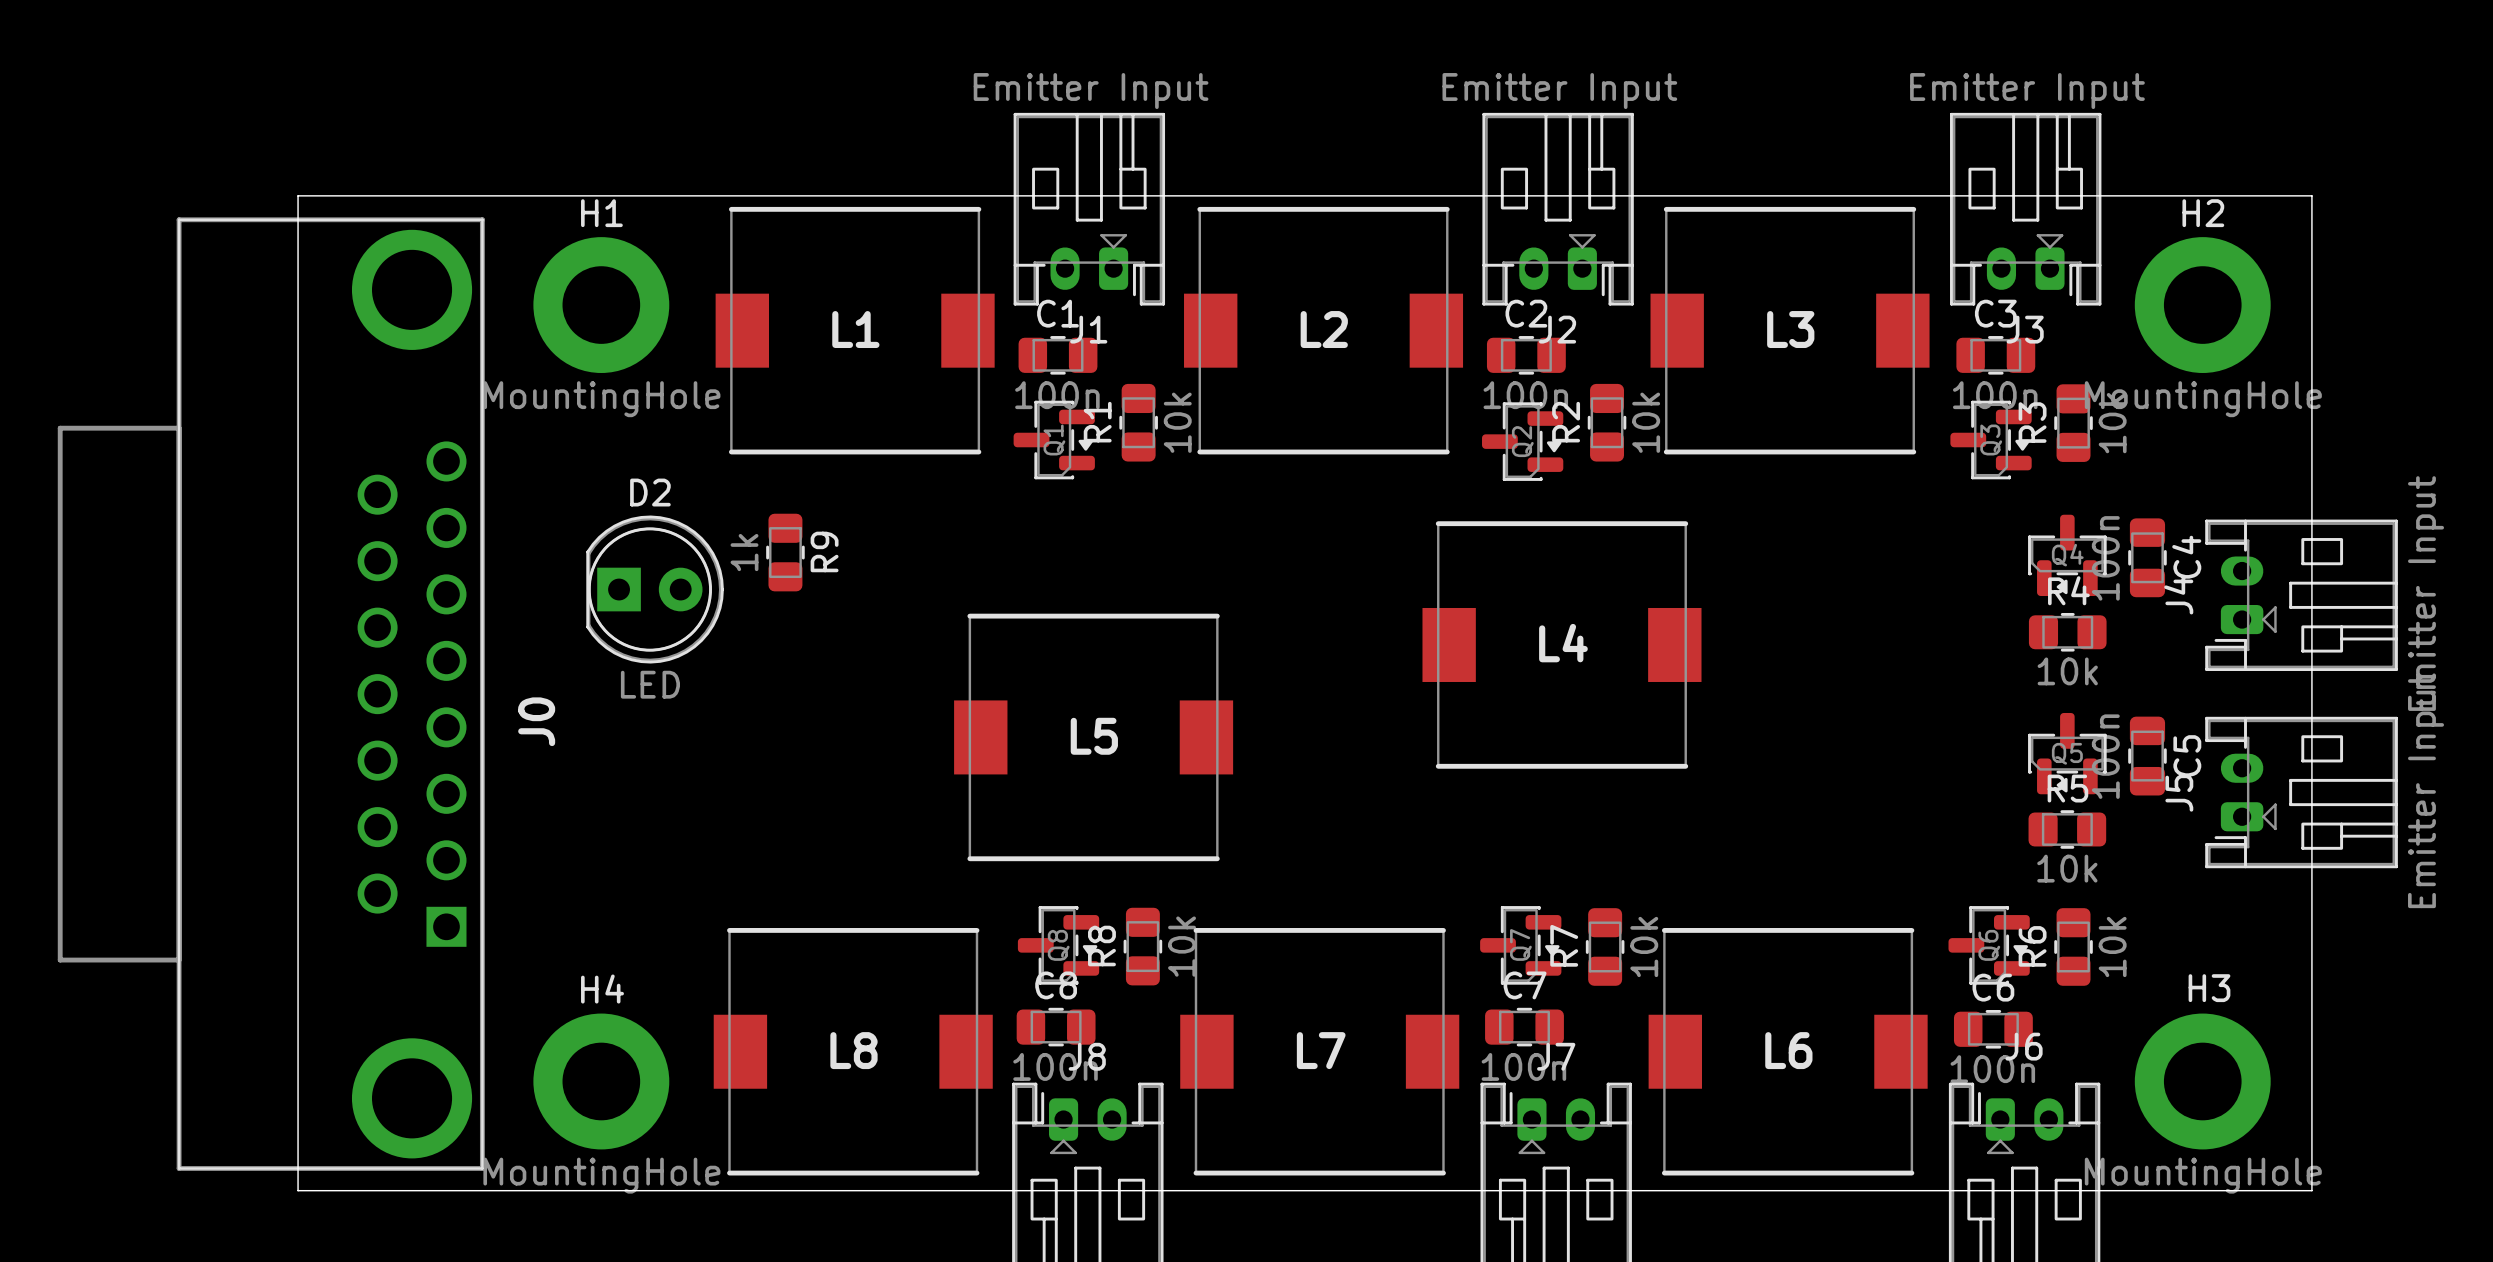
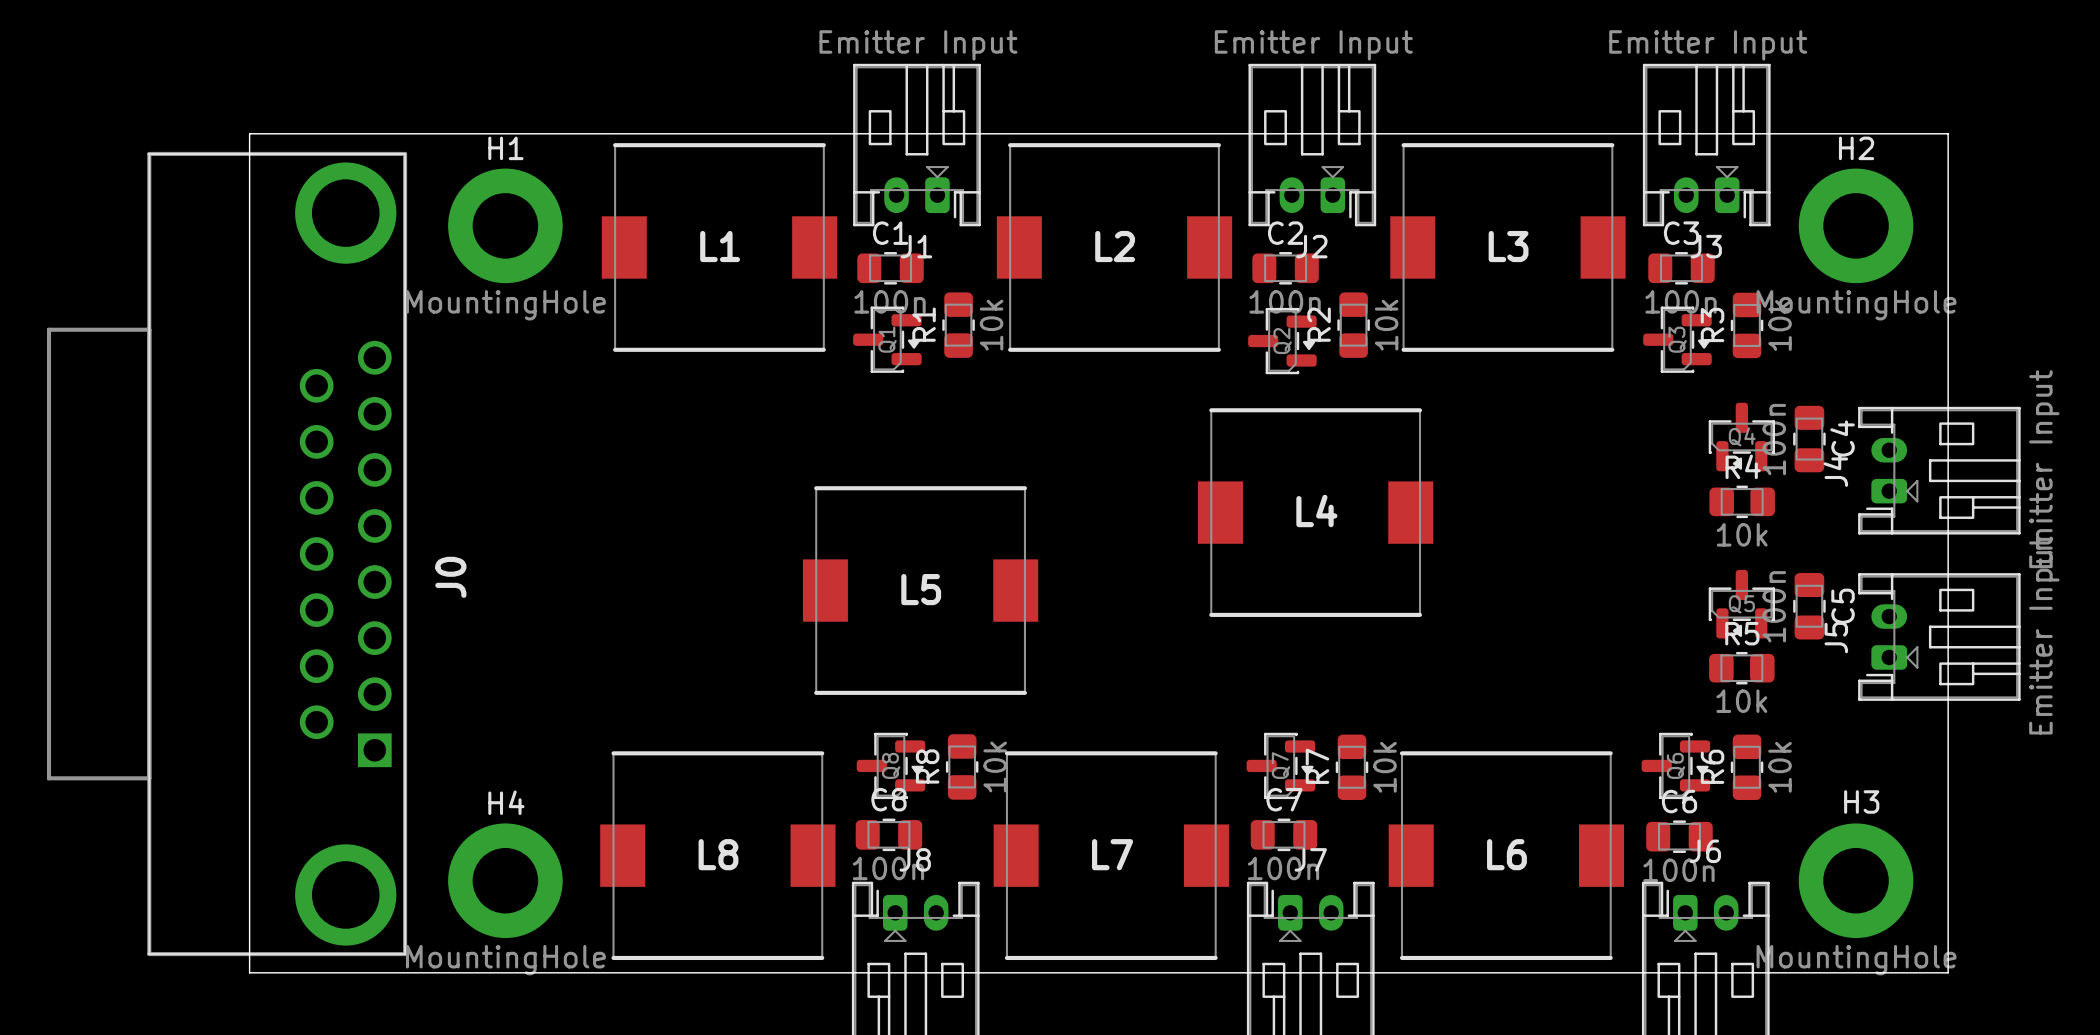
R9: 1k (785, 552) -> none
D2: LED (655, 589) -> none

